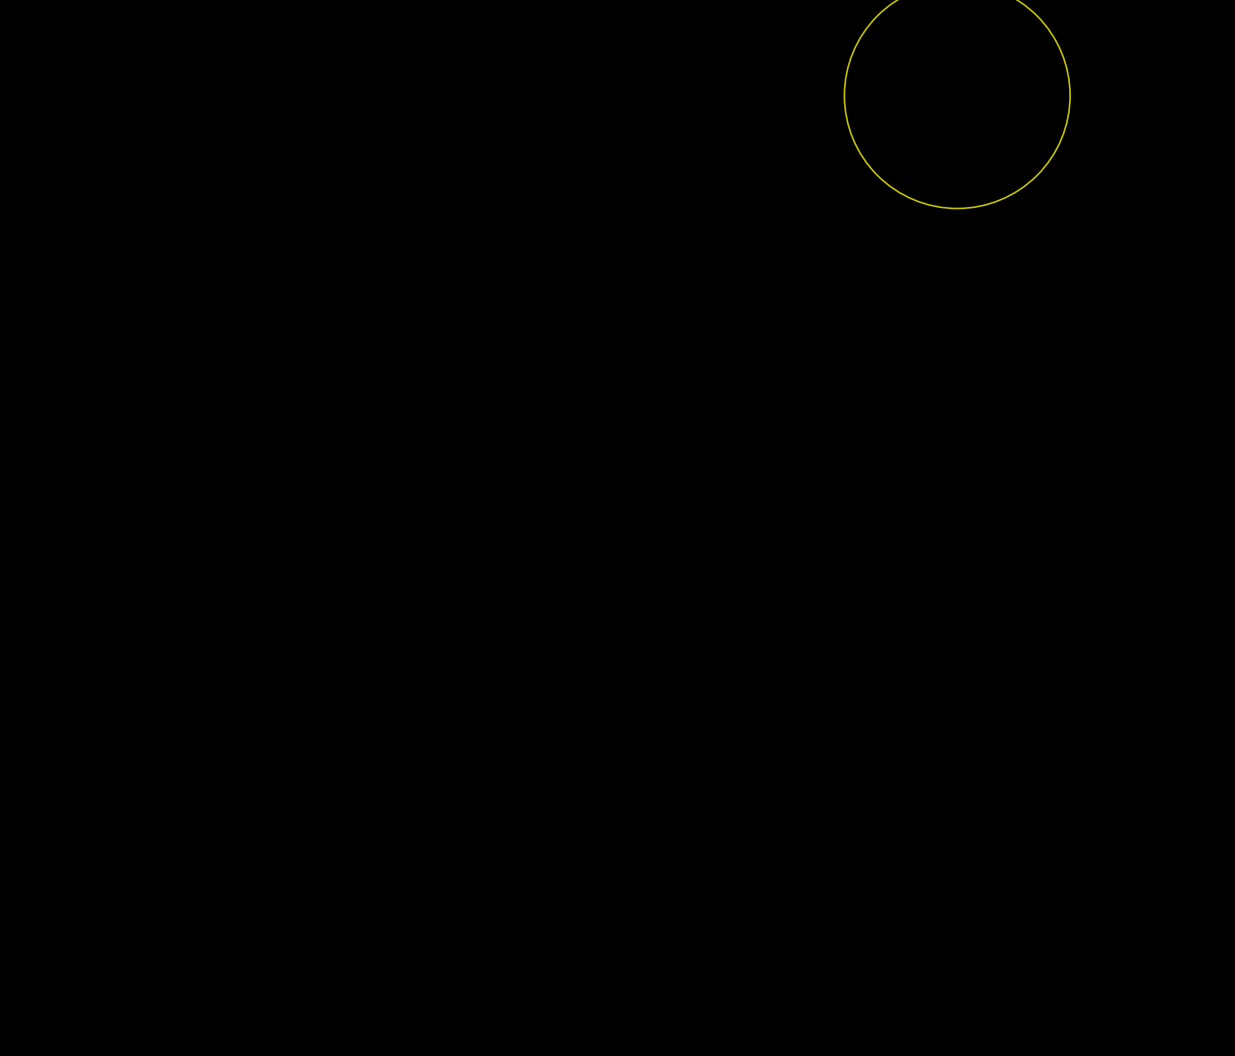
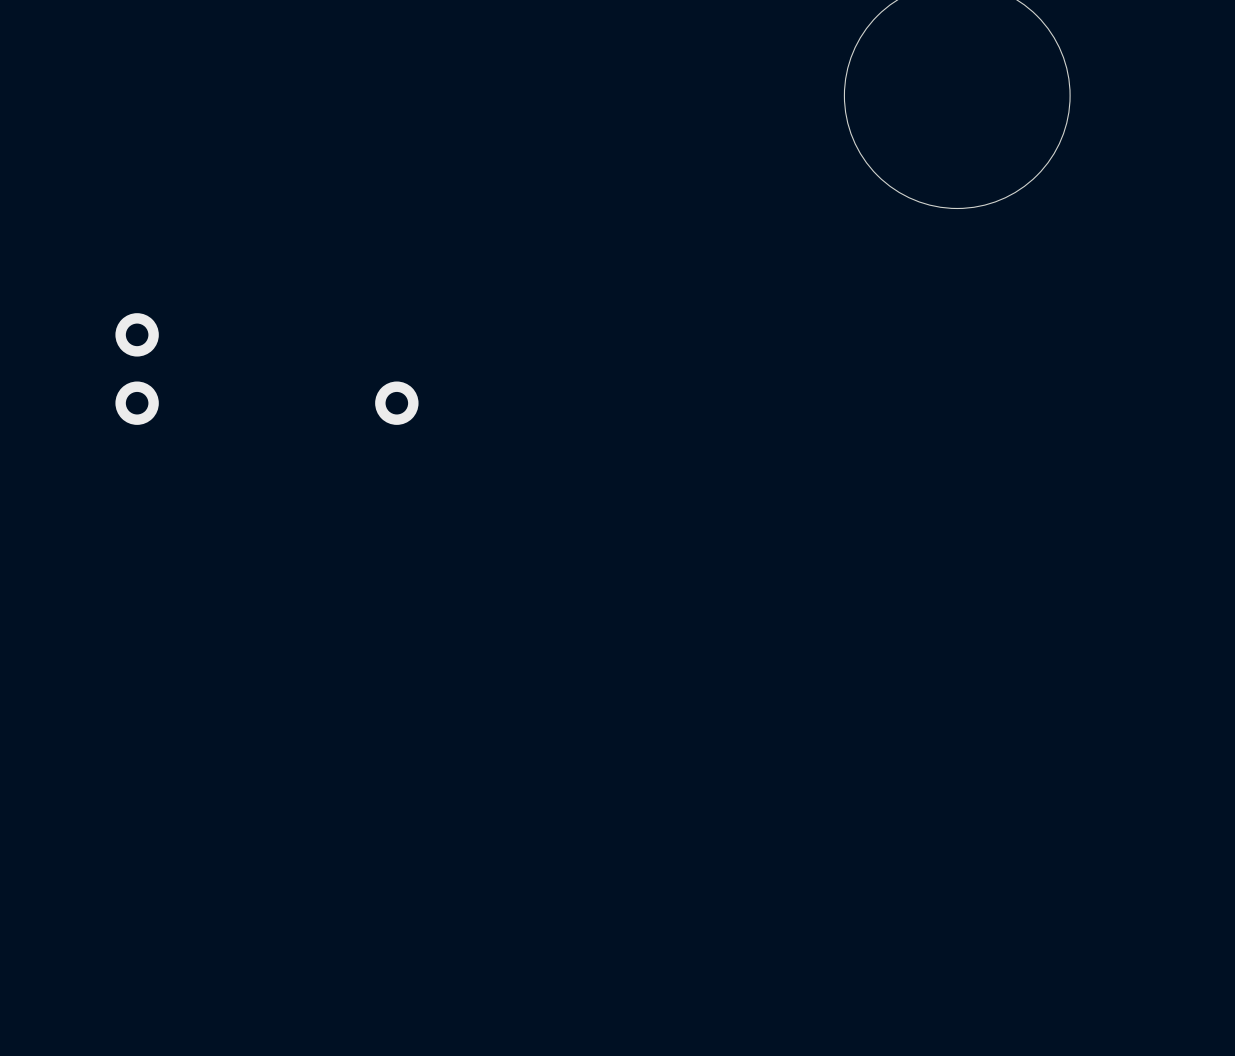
via: none -> (137, 334)
via: none -> (137, 403)
via: none -> (396, 403)

